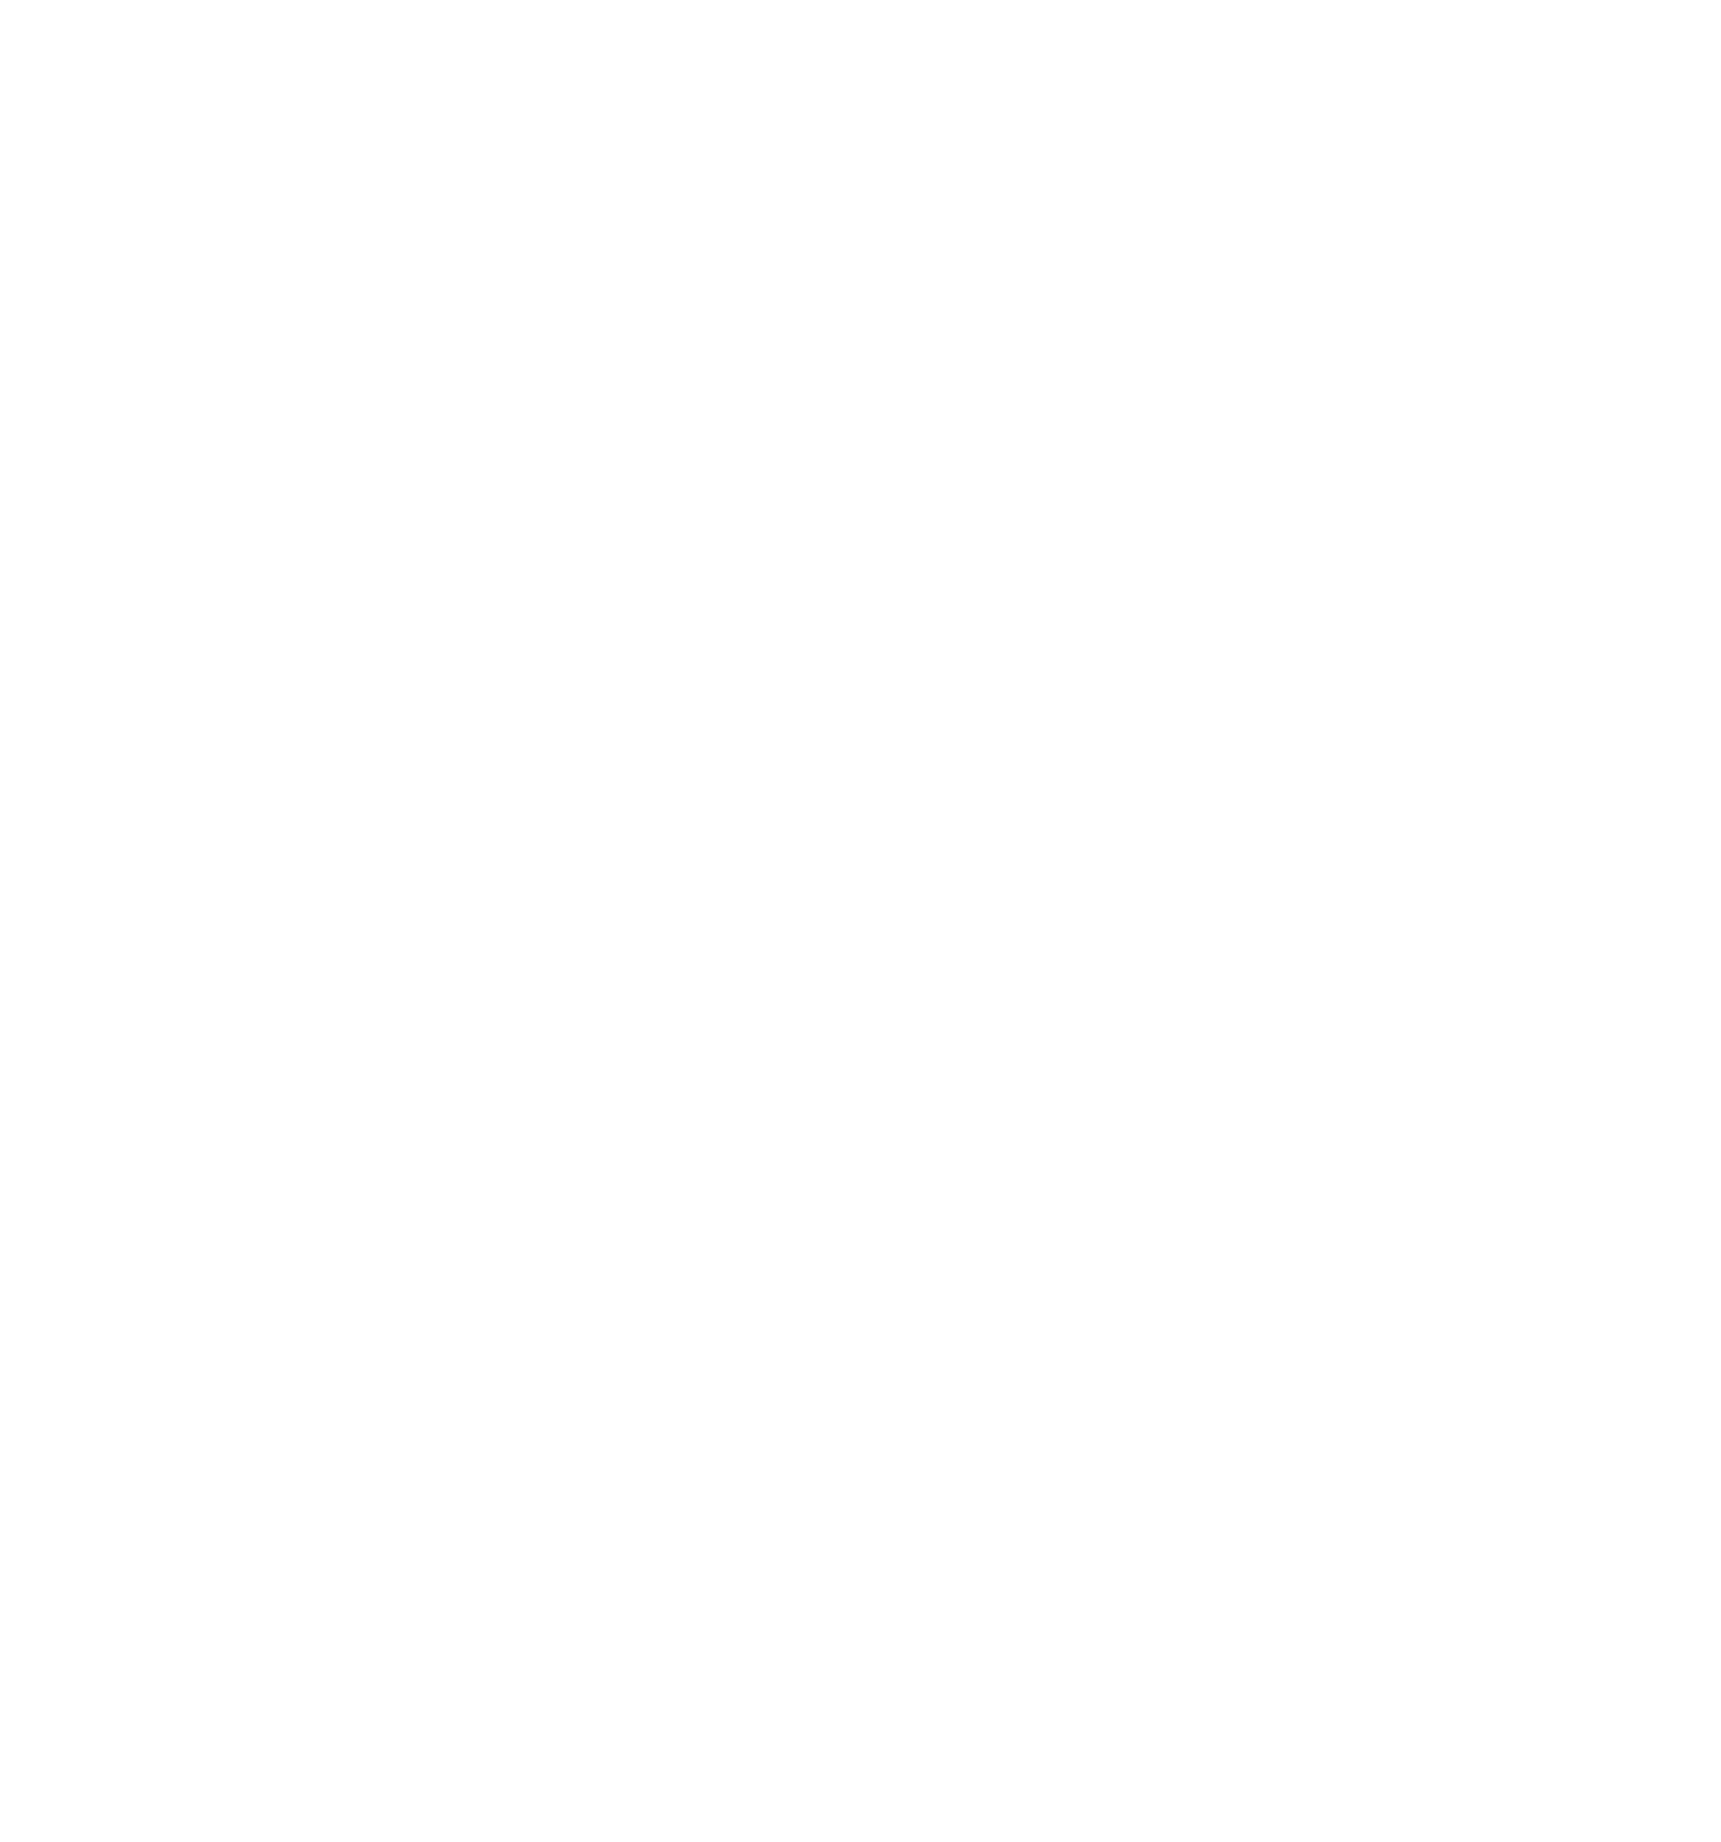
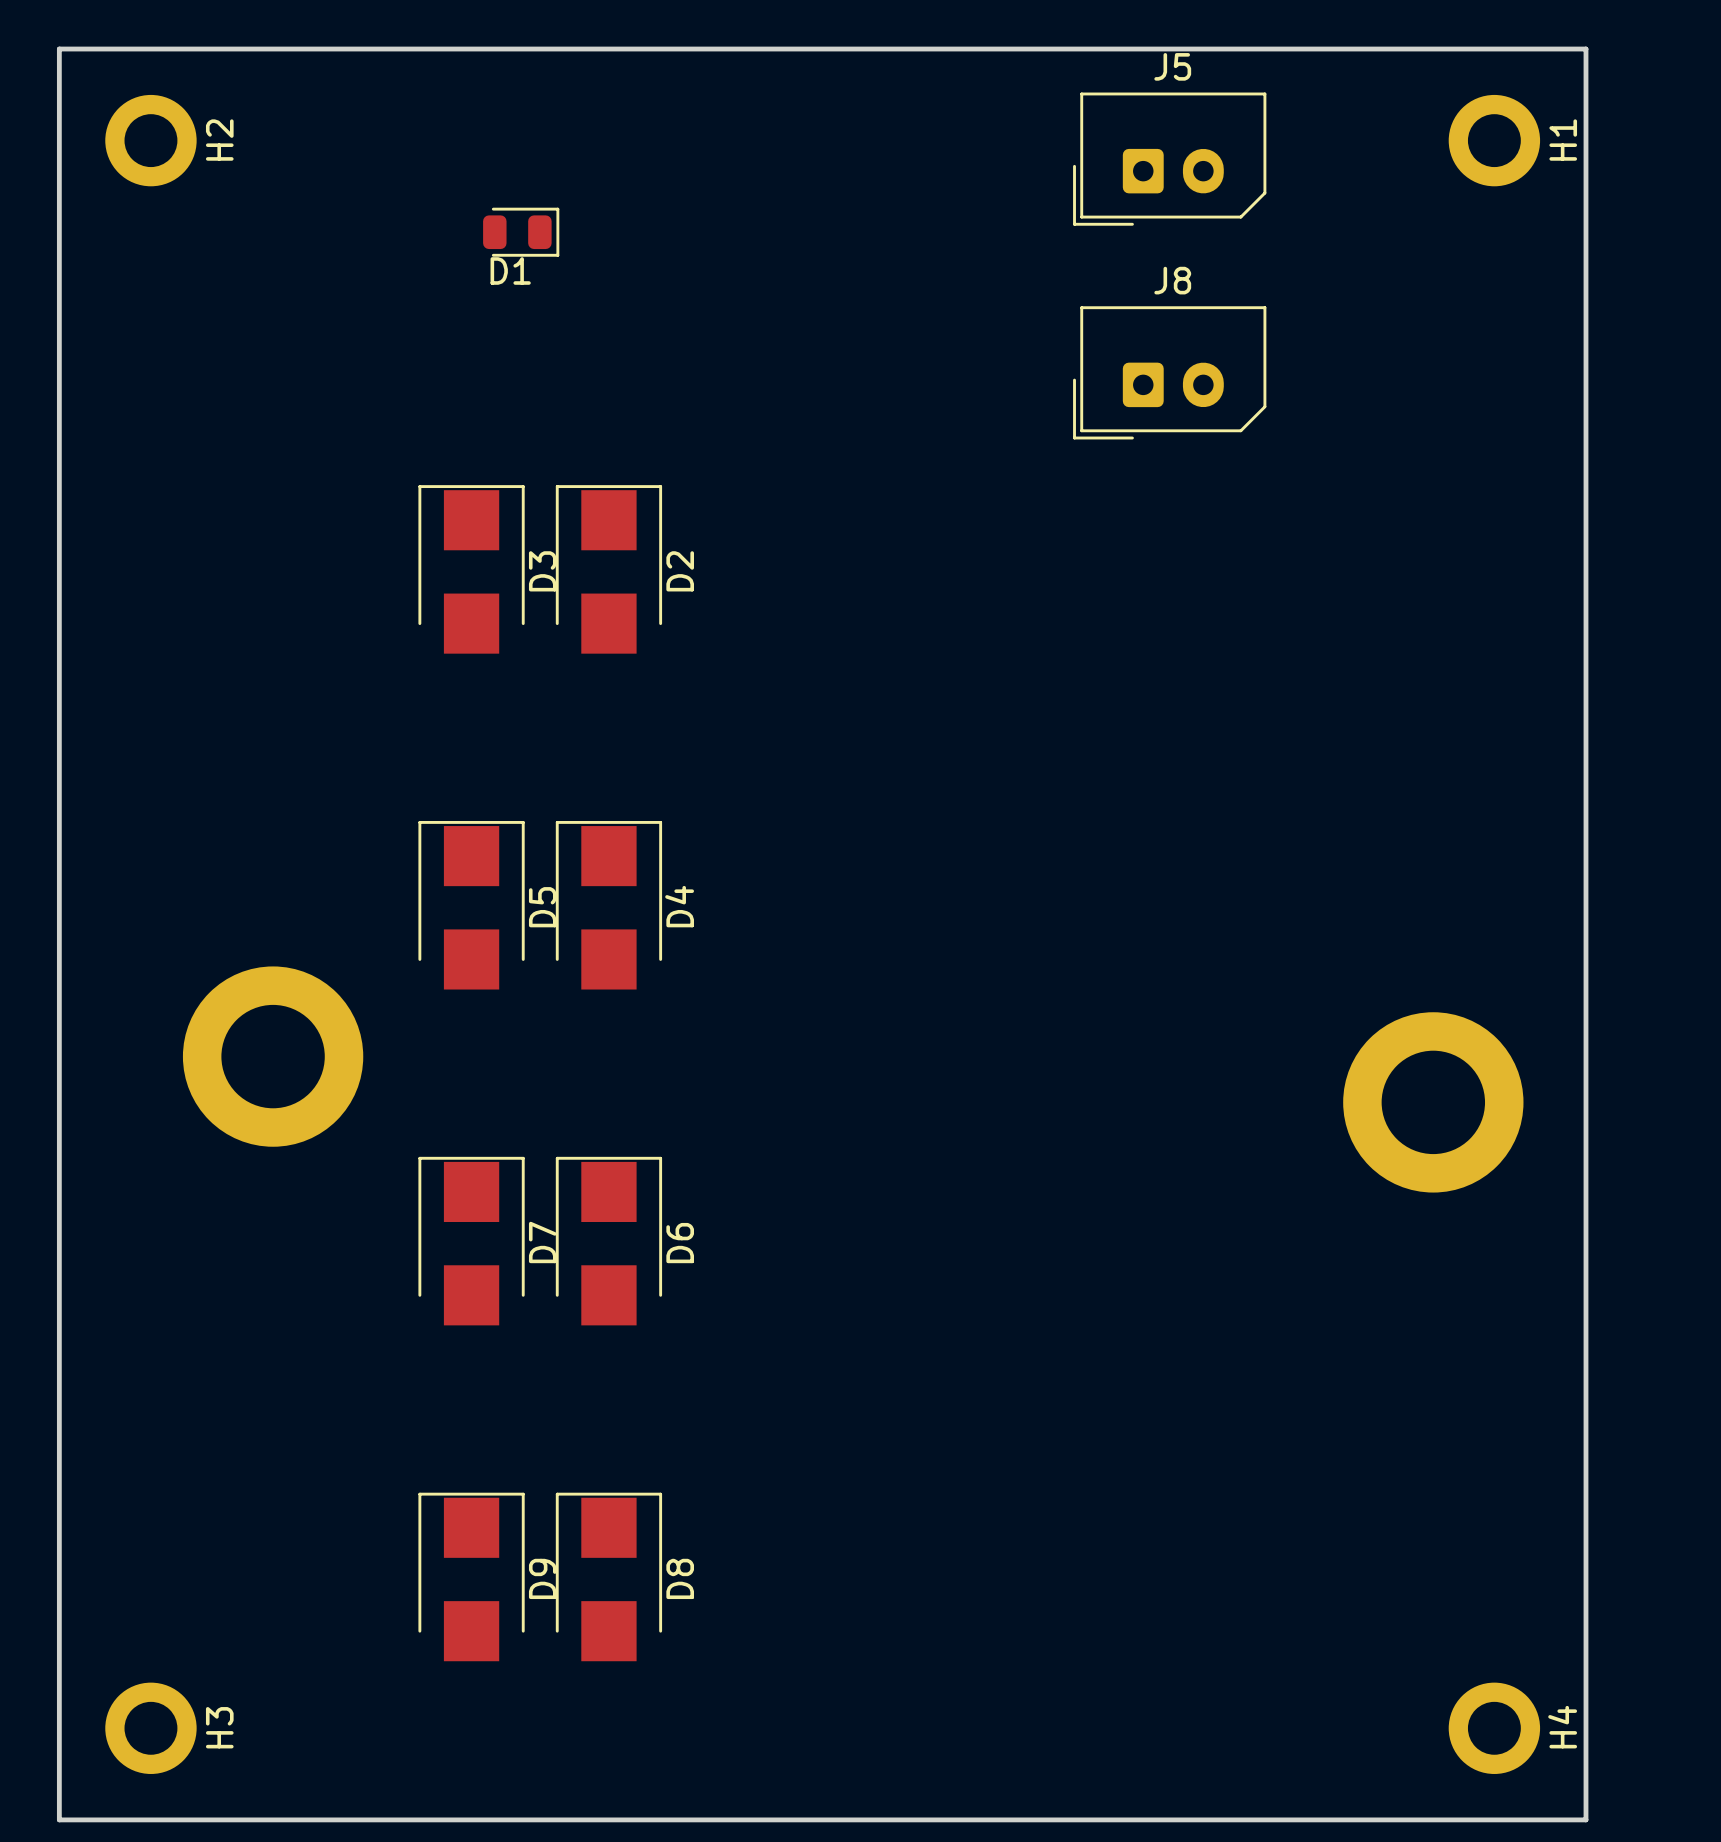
board edge: none -> (59, 49) (59, 1819) (1585, 1819) (1585, 49) (59, 49)
H2: none -> (150, 140)
H1: none -> (1494, 140)
J5: none -> (1169, 159)
D1: none -> (521, 232)
J8: none -> (1169, 372)
D3: none -> (471, 569)
D2: none -> (608, 569)
D5: none -> (471, 905)
D4: none -> (608, 905)
part: none -> (273, 1056)
part: none -> (1433, 1102)
D7: none -> (471, 1241)
D6: none -> (608, 1241)
D9: none -> (471, 1576)
D8: none -> (608, 1576)
H3: none -> (150, 1728)
H4: none -> (1494, 1728)

